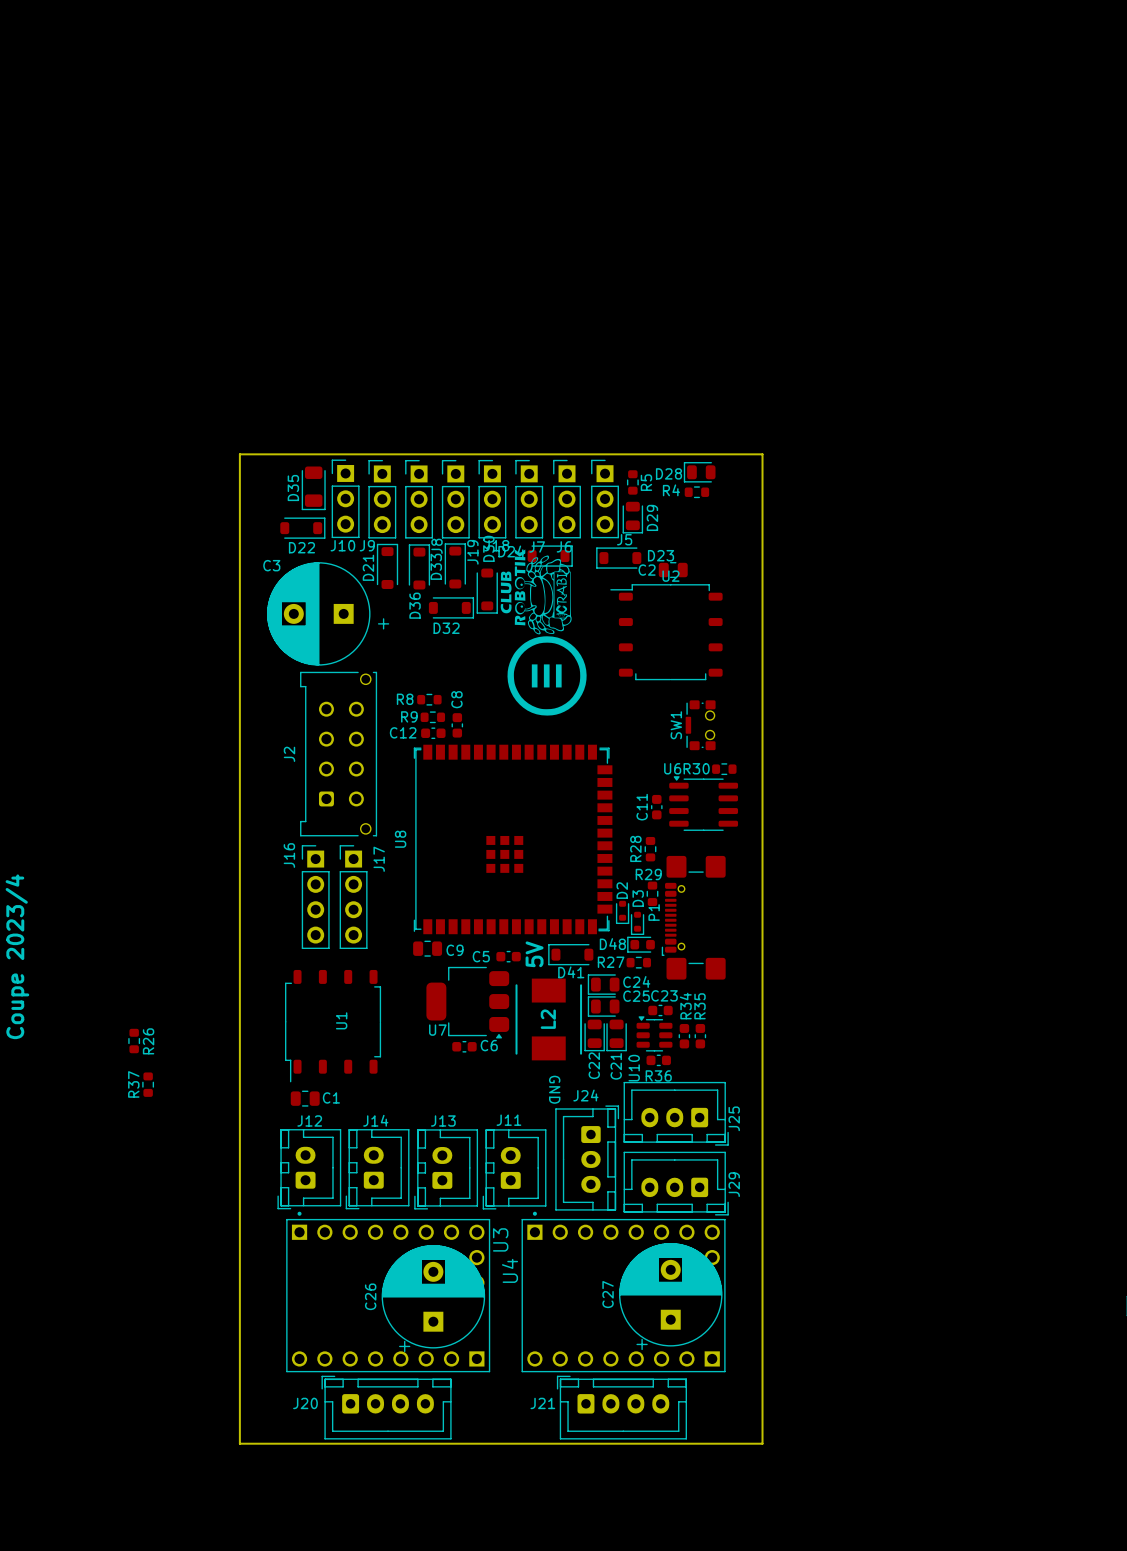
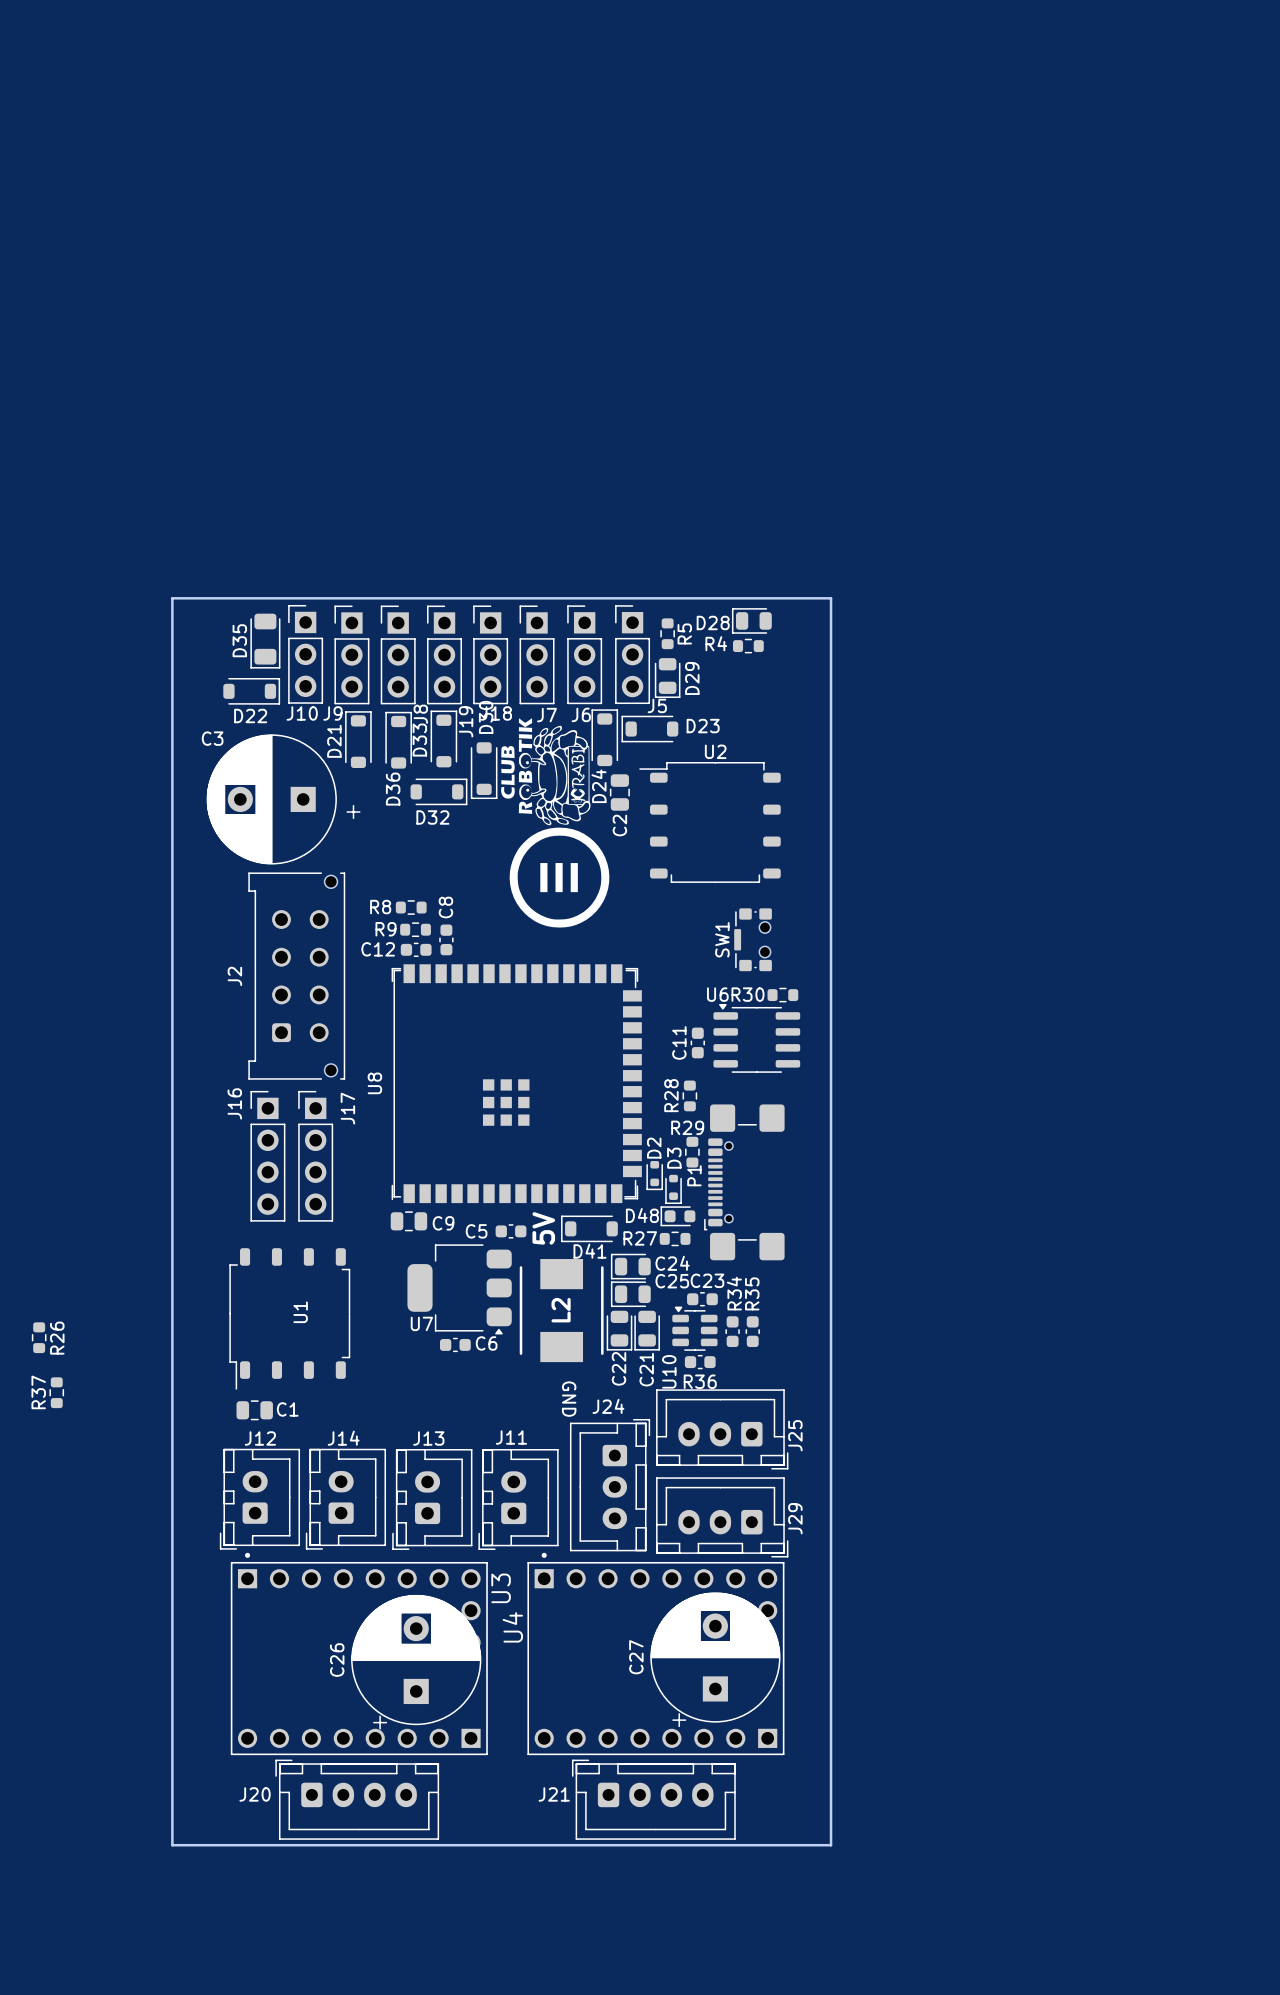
D24 rotation: 0° (550, 556) -> 90° counterclockwise (604, 737)
D24 position: (550, 556) -> (604, 737)
C2 name position: C2 (647, 570) -> C2 (619, 825)
C2 rotation: 0° (673, 570) -> 90° clockwise (619, 792)
C2 position: (673, 570) -> (619, 792)

